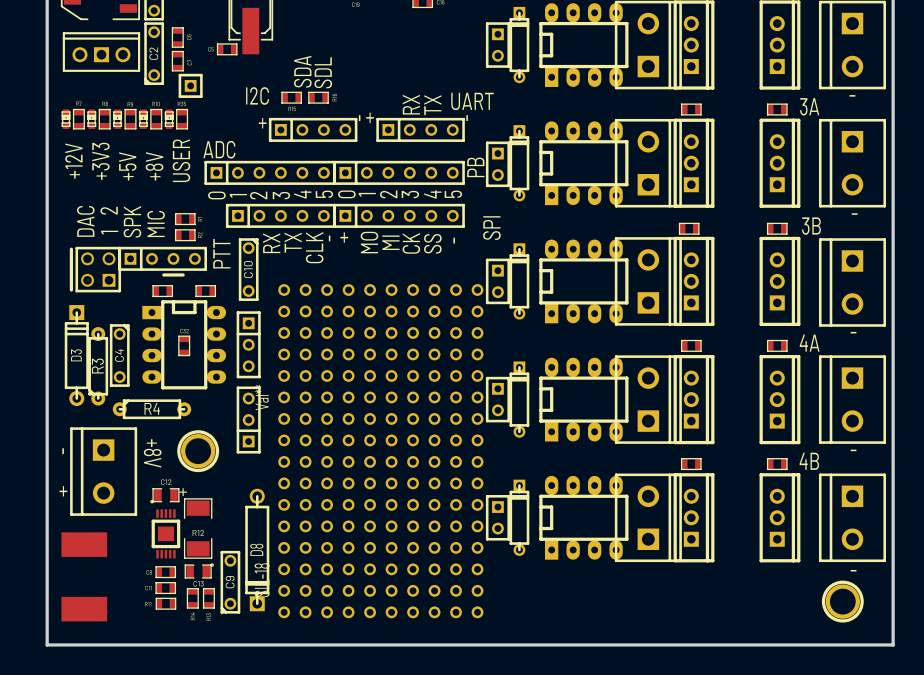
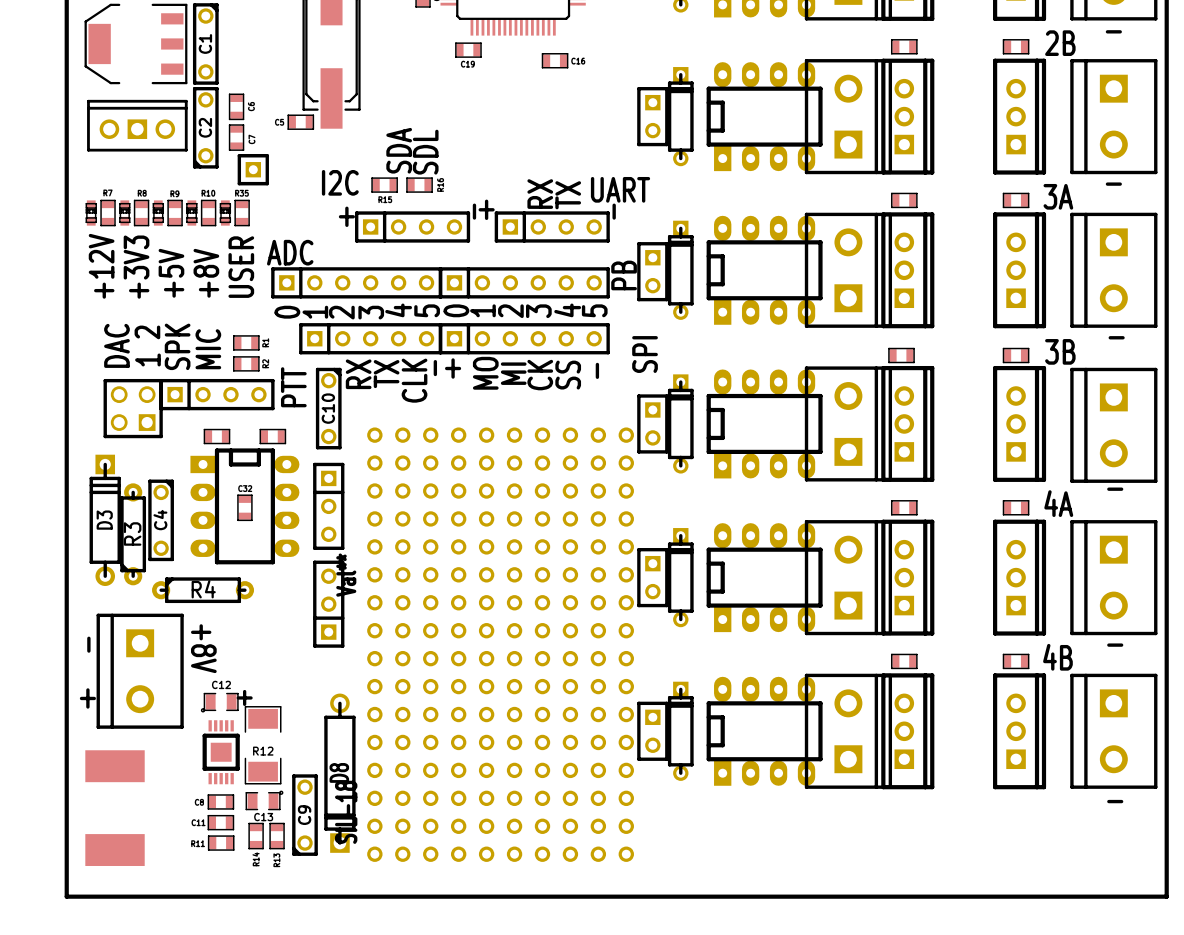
line: (71, 249) (71, 290) -> none
line: (163, 274) (183, 274) -> none
part: (198, 451) -> none
part: (842, 601) -> none

